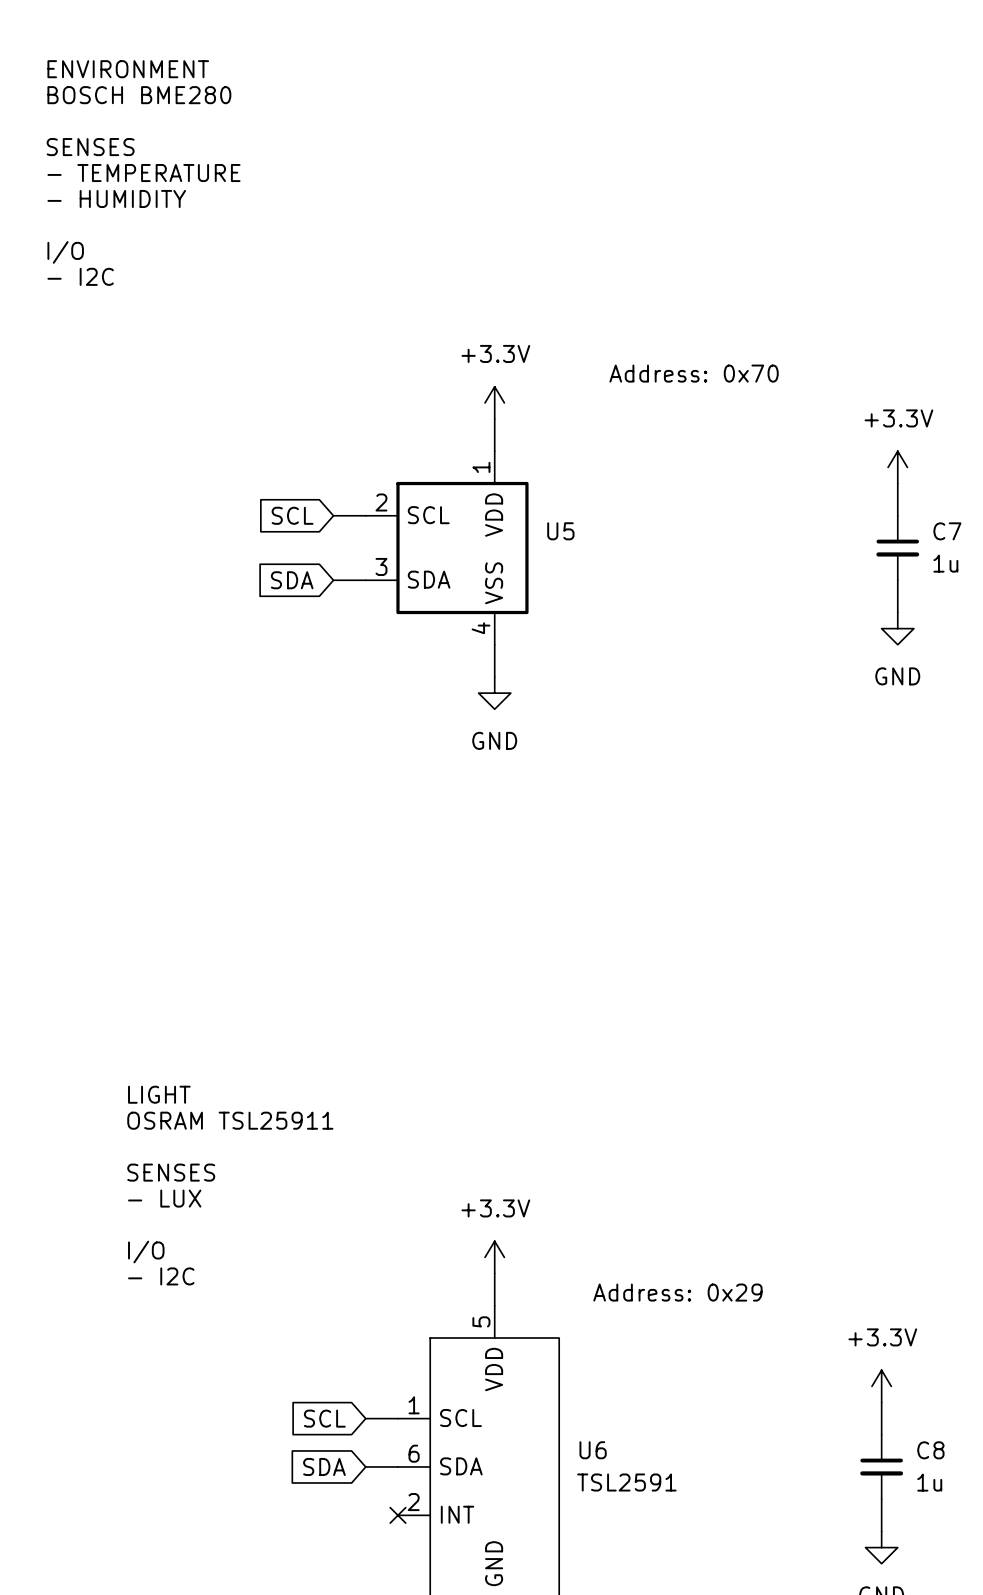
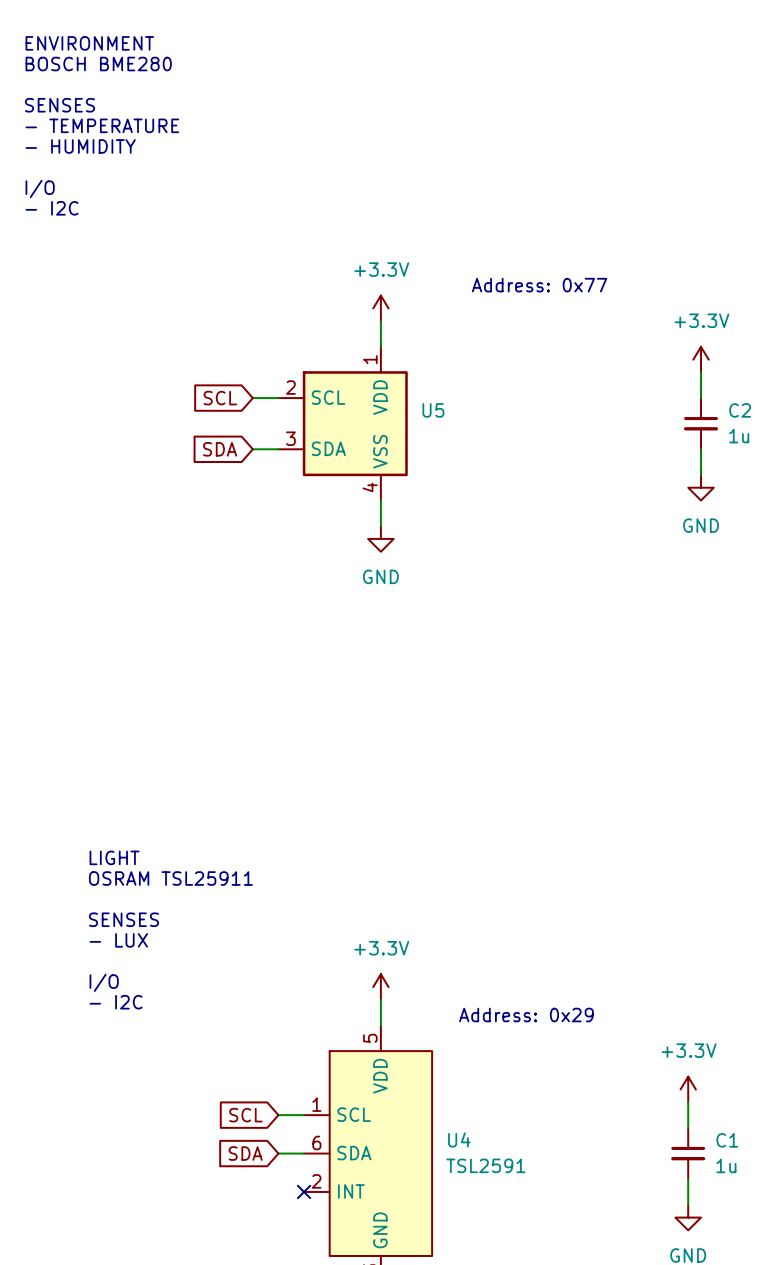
text: Address: 0x70 (694, 373) -> Address: 0x77 (539, 285)
C7 name: C7 (947, 531) -> C2 (740, 410)
U6 name: U6 (593, 1450) -> U4 (459, 1139)
C8 name: C8 (930, 1450) -> C1 (727, 1140)

